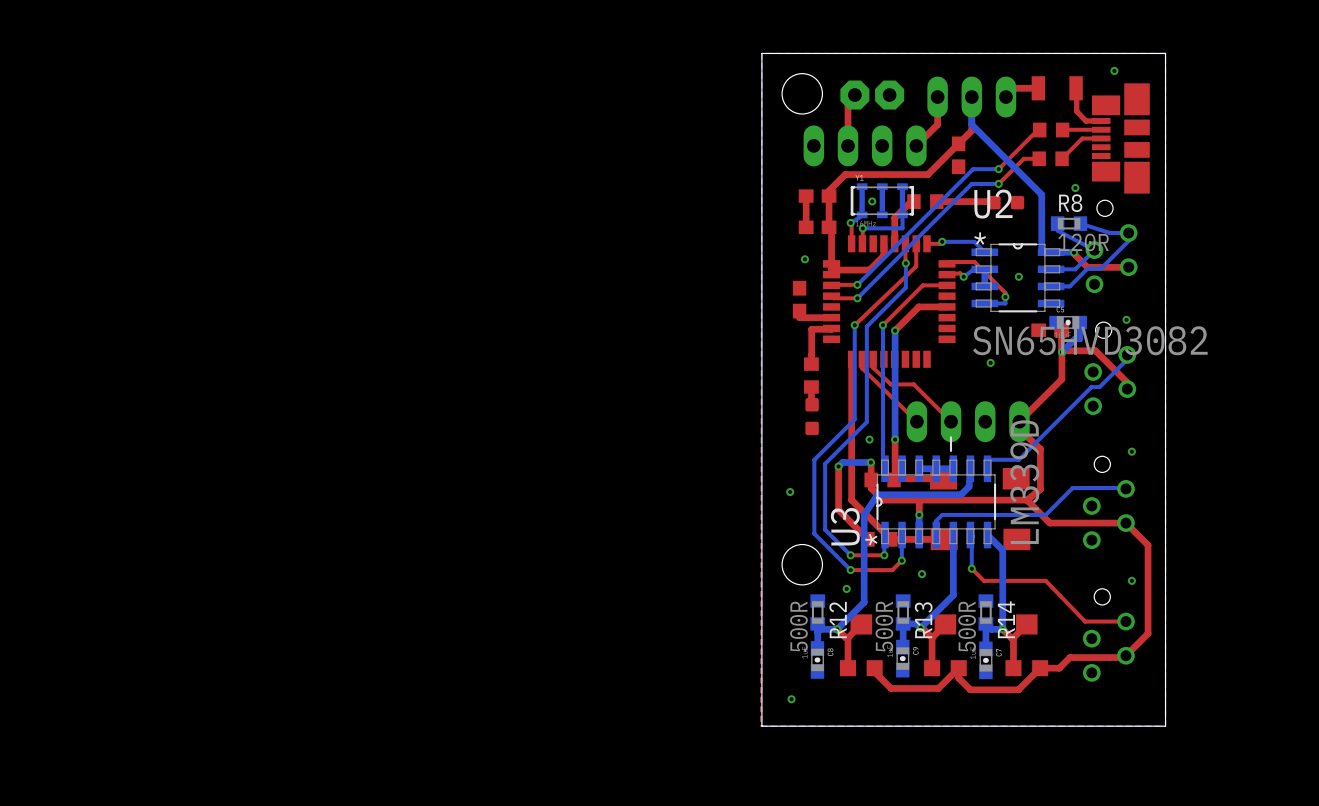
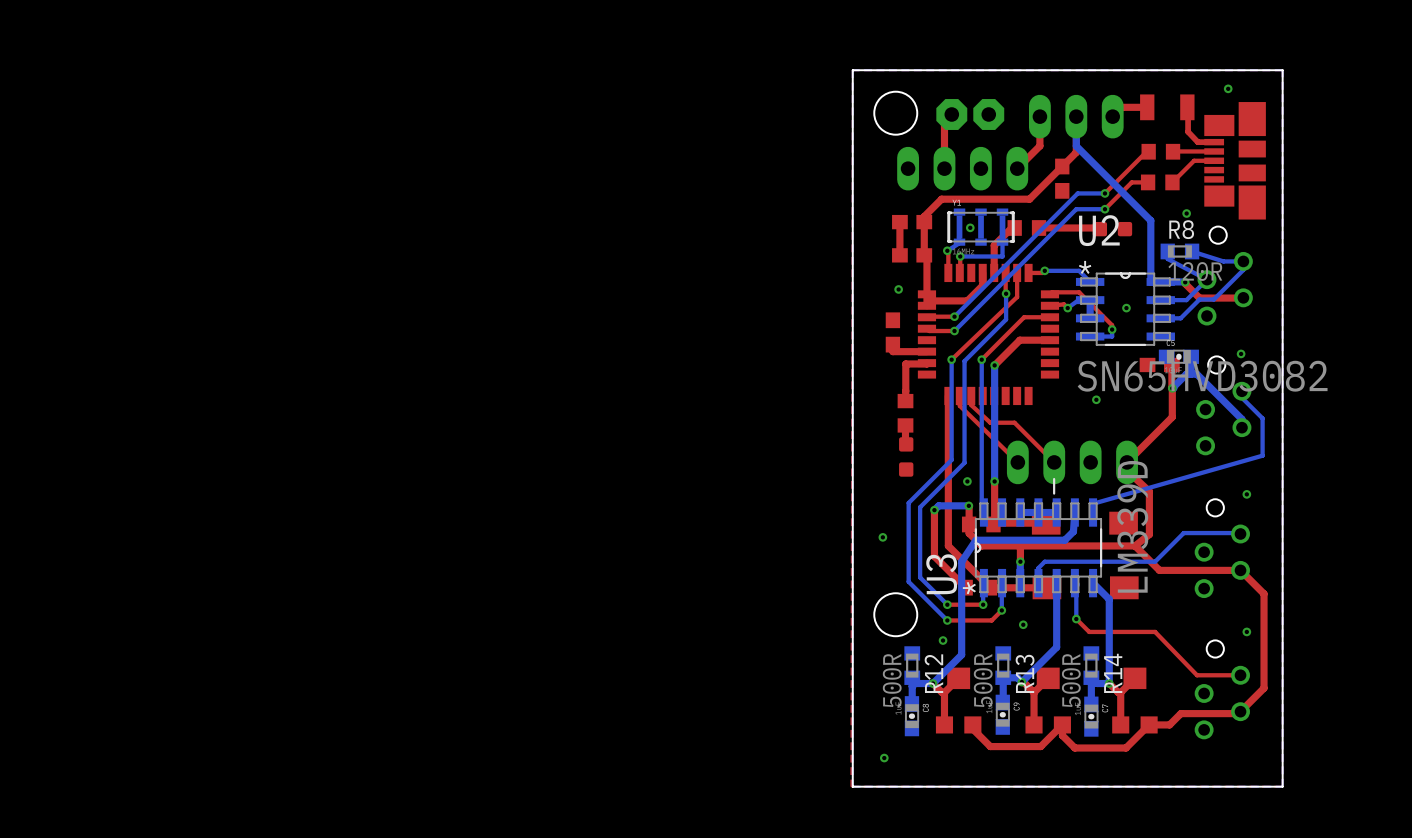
bottom track: none -> (1190, 374) (1196, 374) (1241, 419) (1241, 427)
top track: (1061, 352) (1095, 350) (1127, 382) (1127, 389) -> none
bottom track: (1127, 359) (1099, 387) (1091, 387) (1018, 459) (987, 459) (987, 468) -> (1241, 396) (1262, 418) (1262, 455) (1092, 503) (1093, 512)

